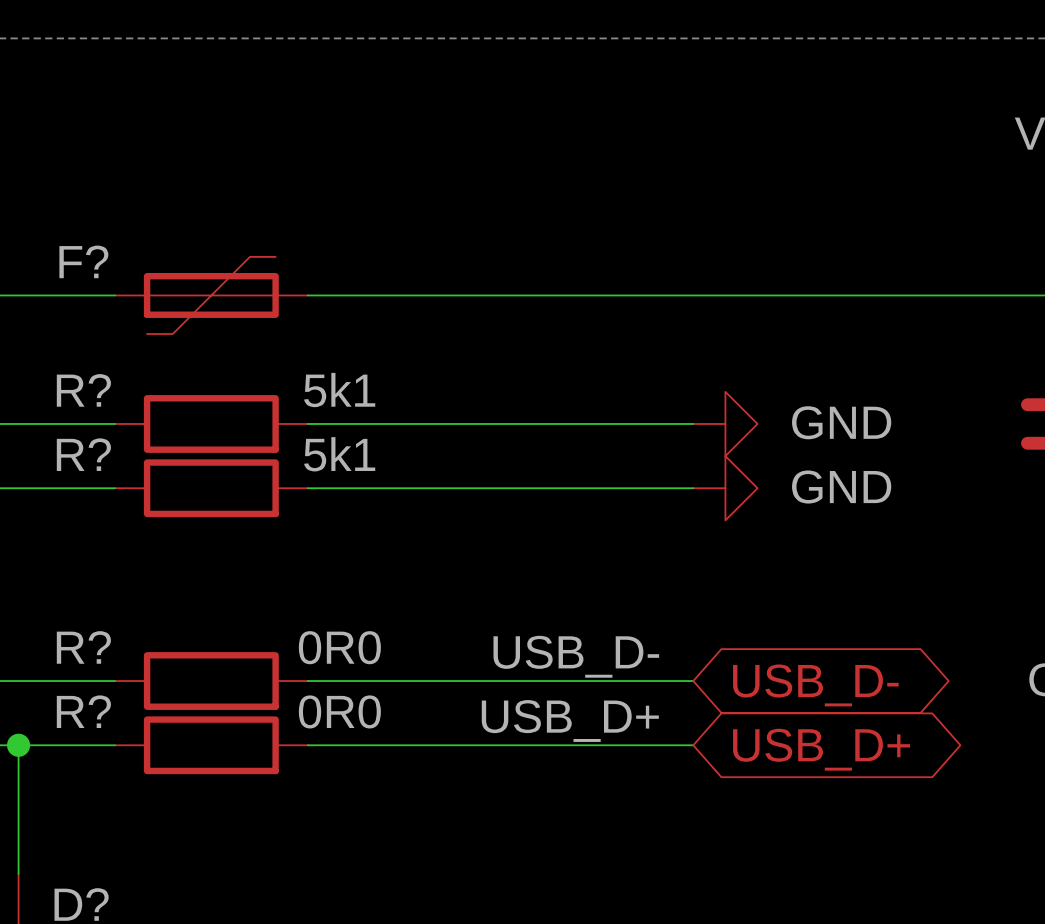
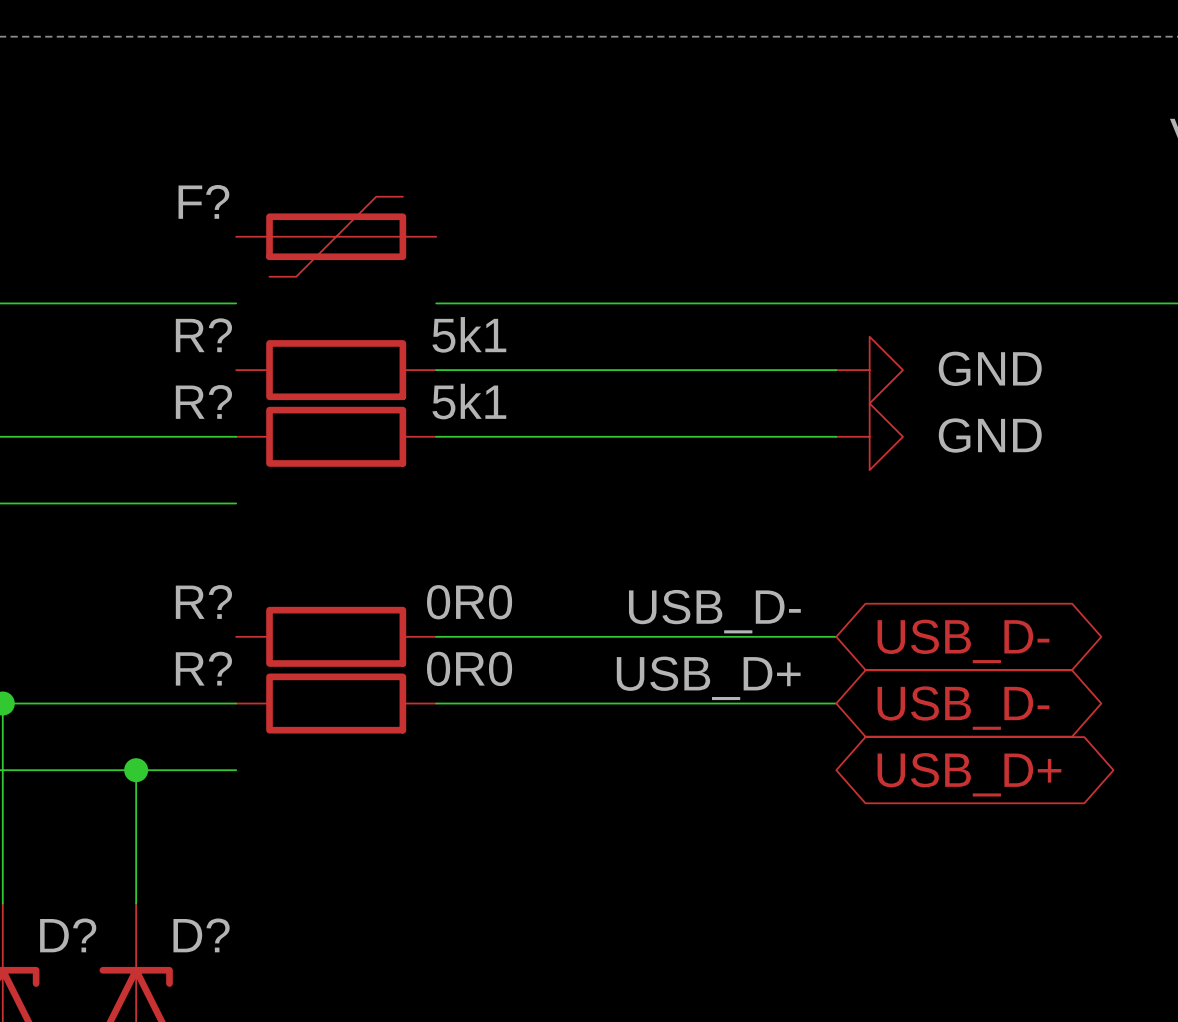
F? position: (211, 295) -> (336, 236)
R? position: (211, 488) -> (336, 370)
wire: (307, 488) (693, 488) -> (436, 370) (836, 370)
power symbol position: GND (725, 488) -> GND (869, 370)
label: none -> USB_D- (714, 611)
global label: none -> USB_D- (963, 641)
label: USB_D- (576, 656) -> USB_D+ (708, 678)
label: USB_D+ (570, 721) -> none
R? position: (211, 745) -> (336, 636)
wire: (307, 745) (693, 745) -> (436, 636) (836, 636)

